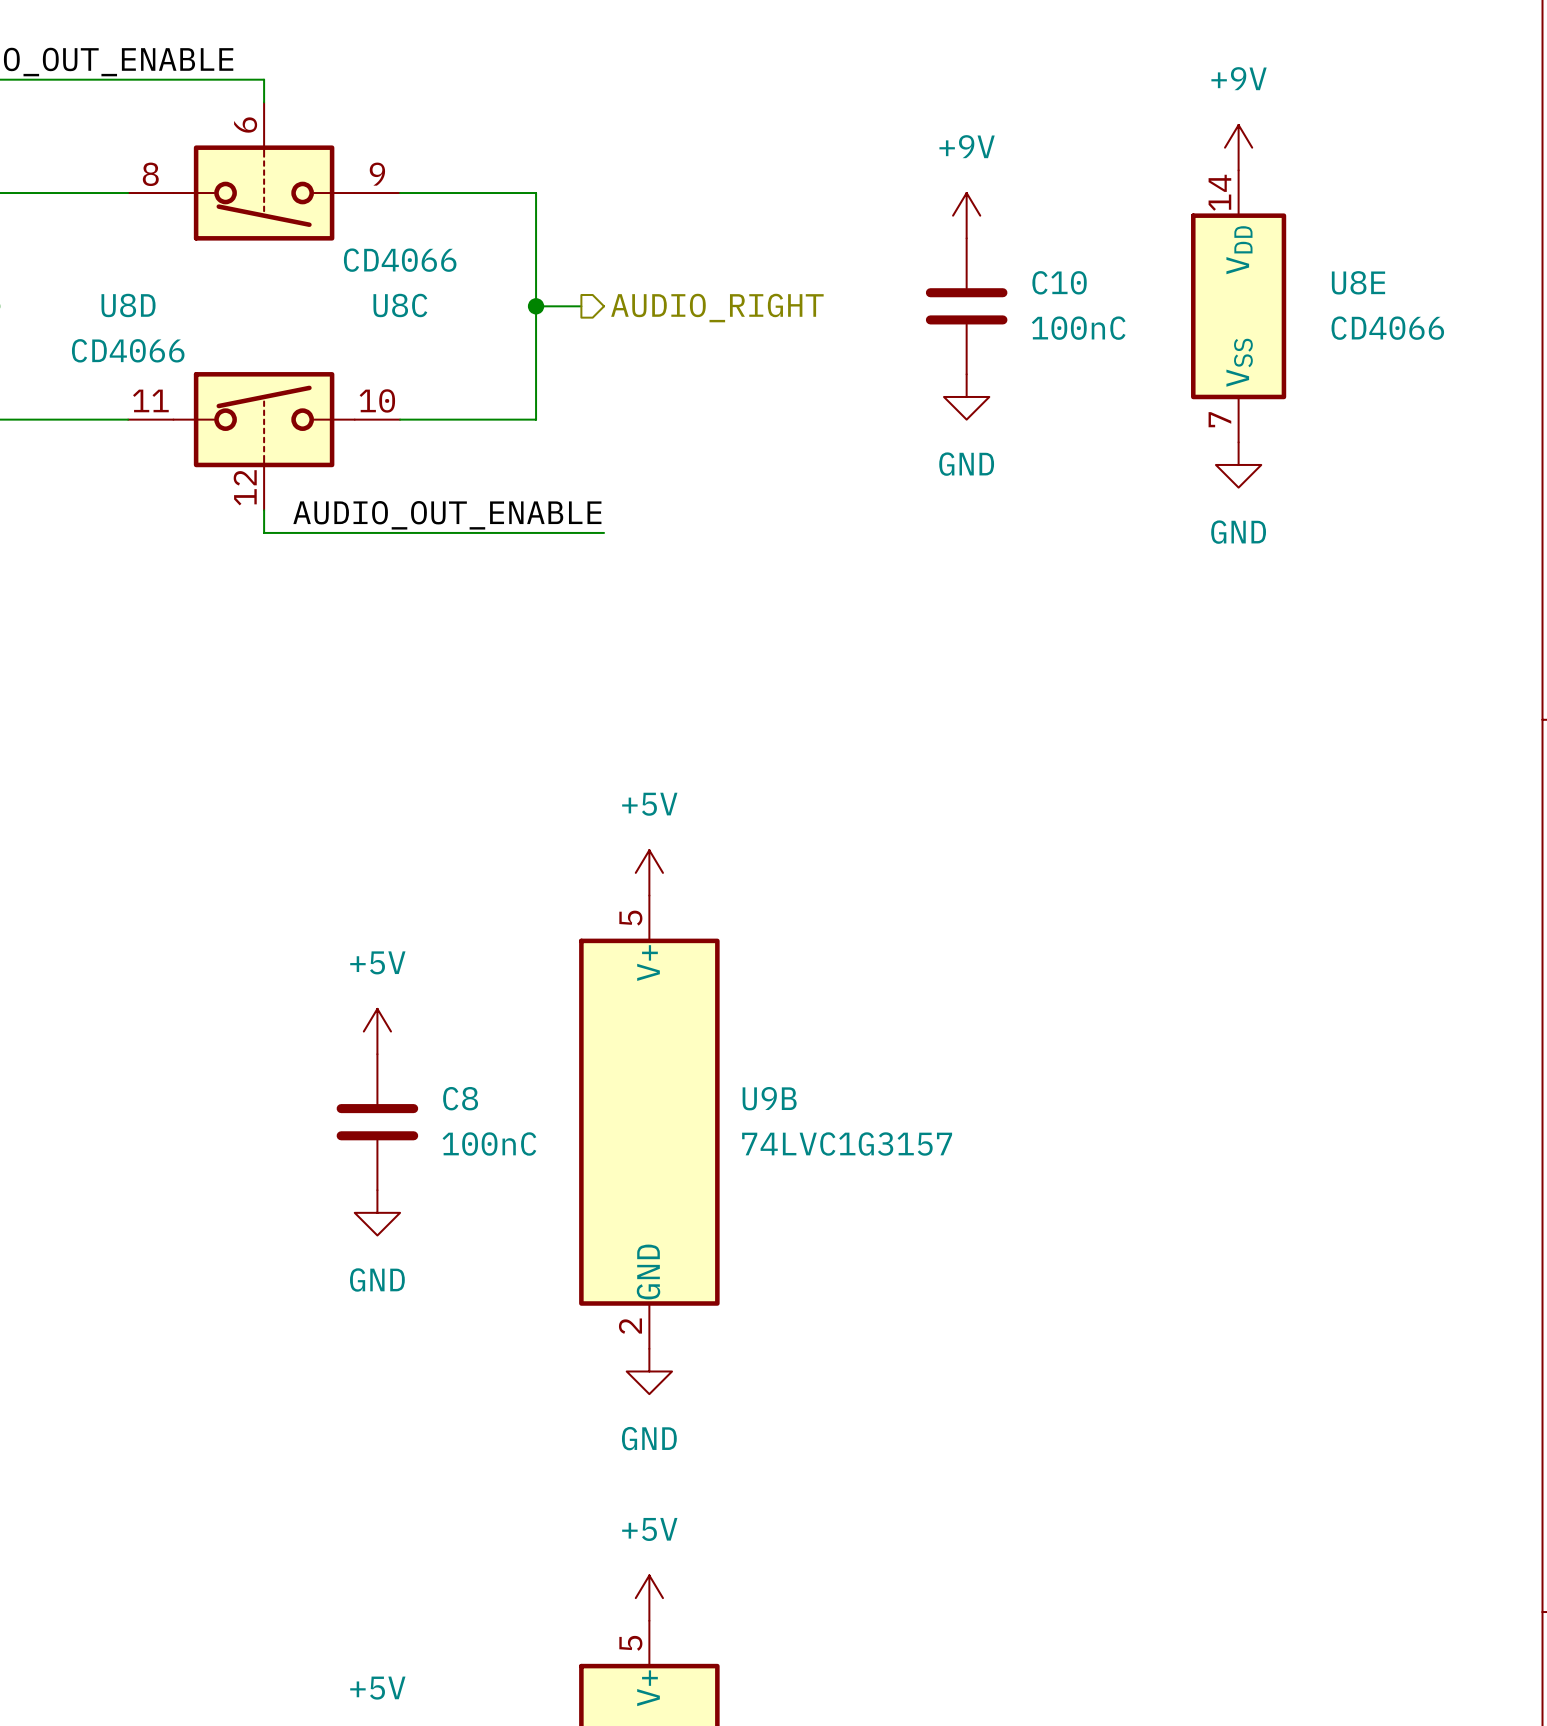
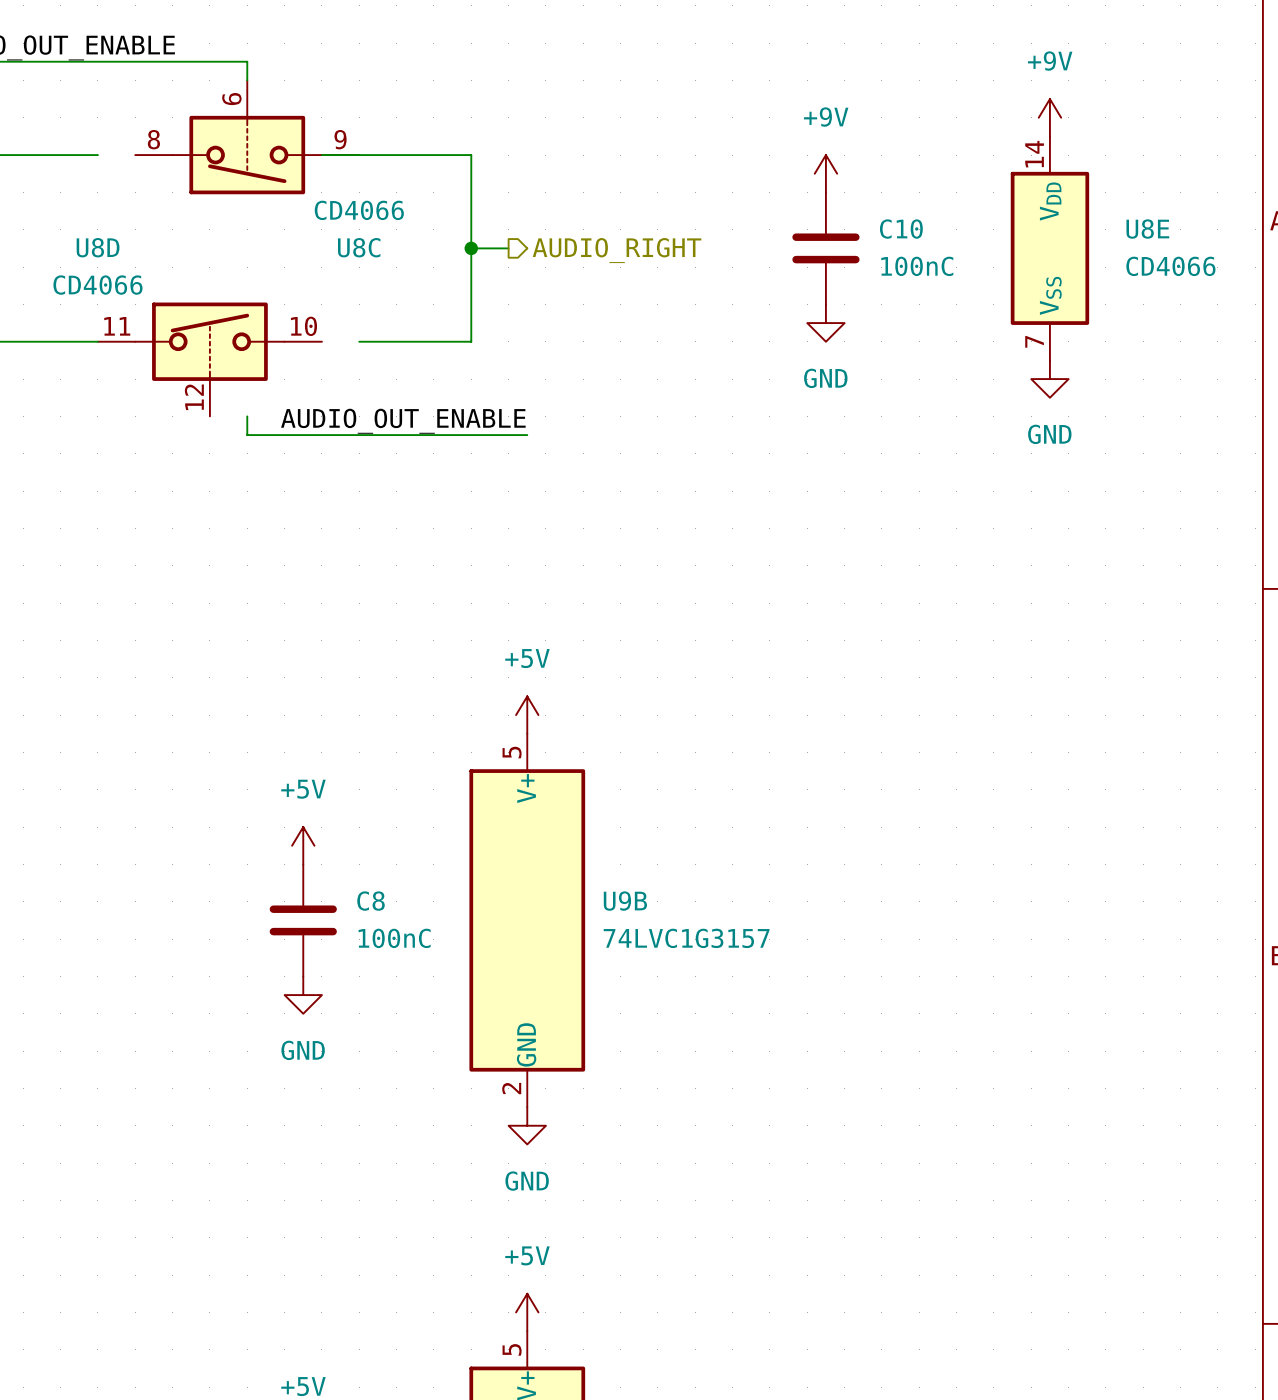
wire: (264, 79) (264, 102) -> (209, 61) (247, 61) (247, 80)
power symbol position: +9V (1238, 147) -> +9V (1049, 117)
U8C position: (264, 171) -> (247, 137)
wire: (536, 193) (536, 419) -> (433, 155) (471, 155) (471, 341) (433, 341)
power symbol position: +9V (966, 215) -> +9V (825, 173)
wire: (536, 306) (581, 306) -> (508, 248) (471, 248)
junction position: (536, 306) -> (471, 248)
C10 position: (966, 306) -> (825, 248)
U8E position: (1238, 306) -> (1049, 248)
hierarchical label position: AUDIO_RIGHT (717, 308) -> AUDIO_RIGHT (617, 250)
power symbol position: GND (966, 396) -> GND (825, 323)
wire: (400, 419) (445, 419) -> (489, 435) (527, 435)
power symbol position: GND (1238, 464) -> GND (1049, 379)
wire: (264, 510) (264, 532) (309, 532) -> (247, 416) (247, 435)
label position: AUDIO_OUT_ENABLE (447, 515) -> AUDIO_OUT_ENABLE (403, 421)

